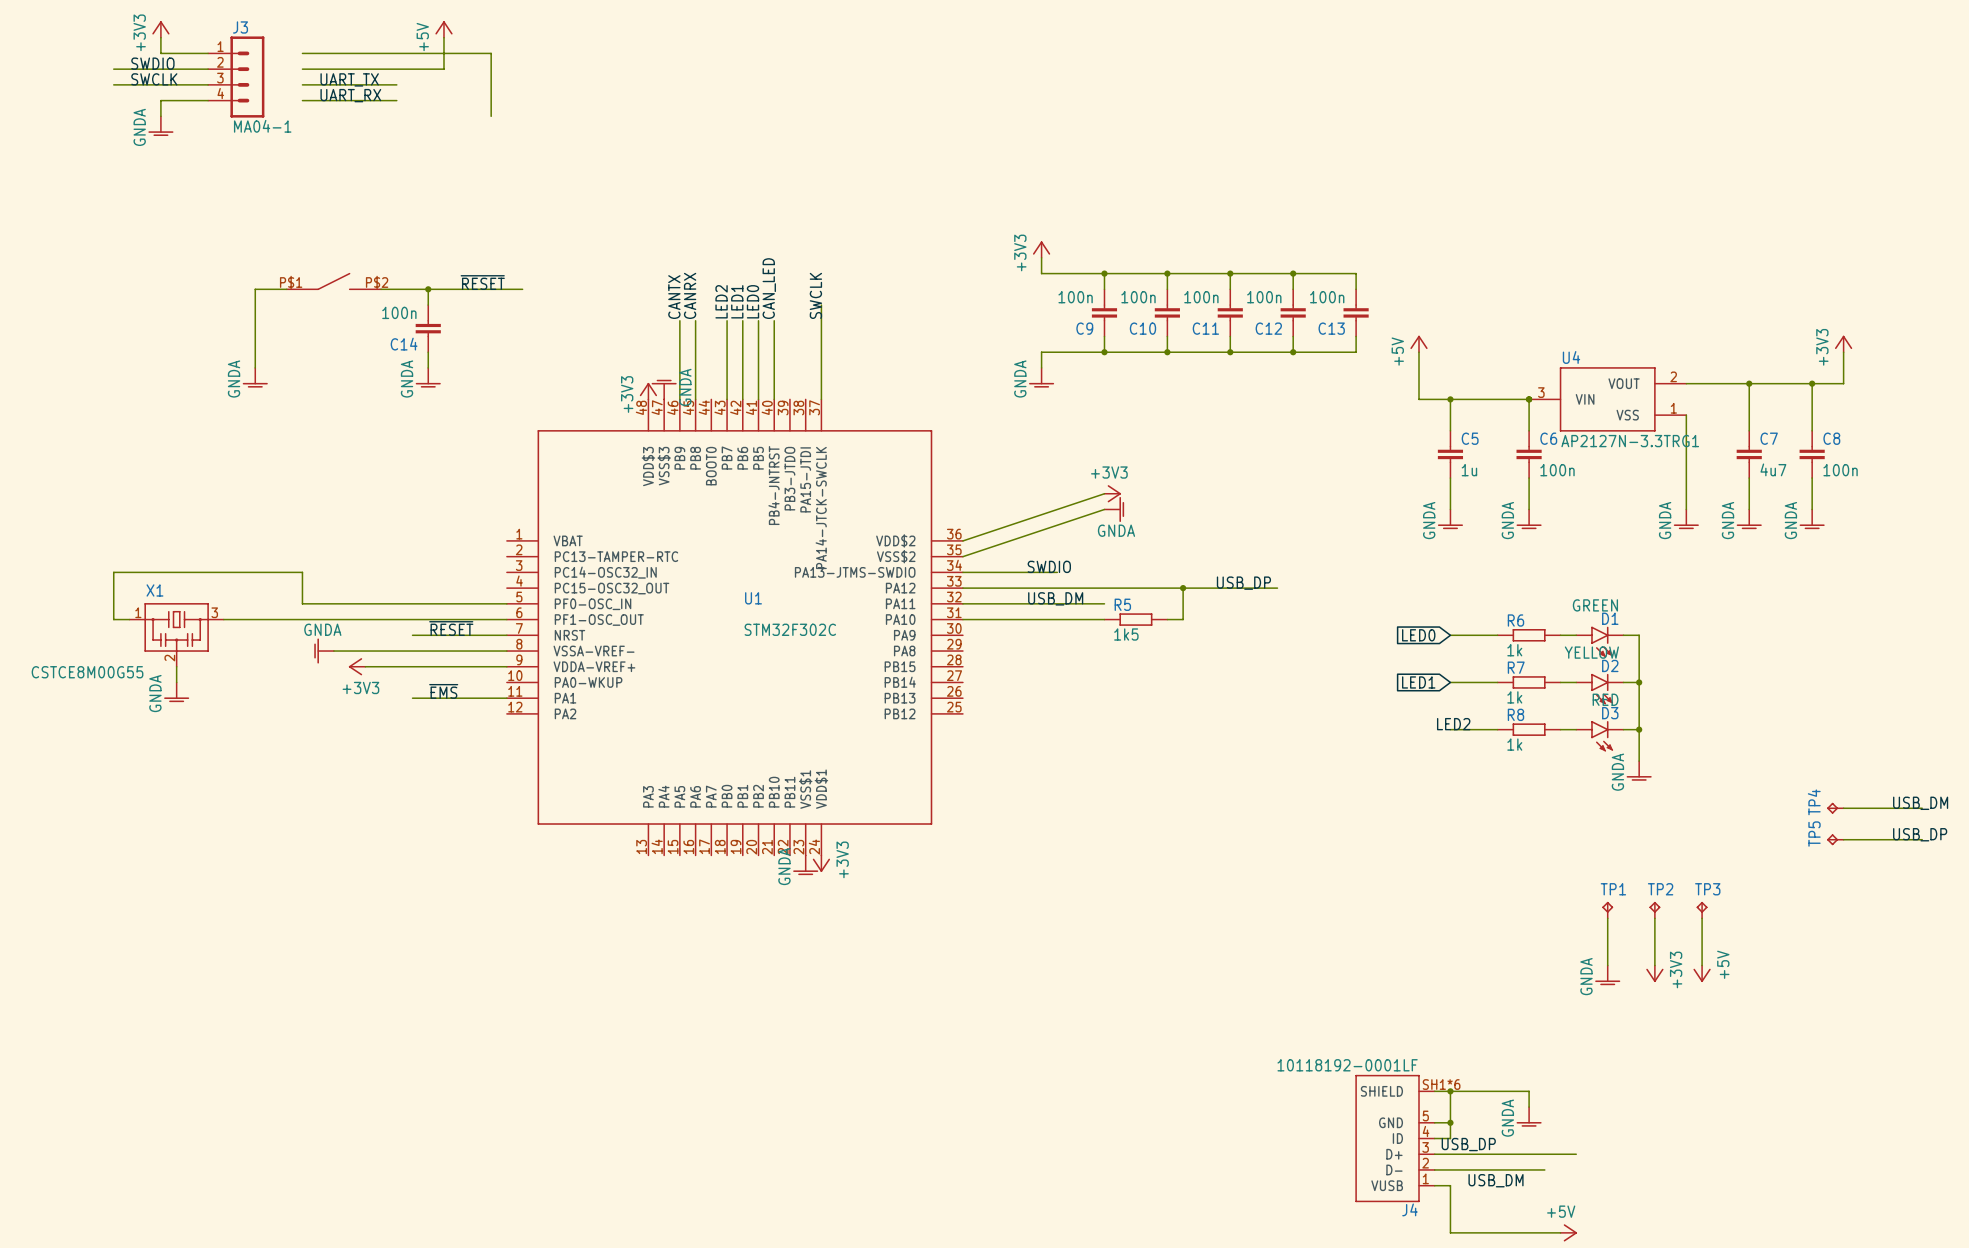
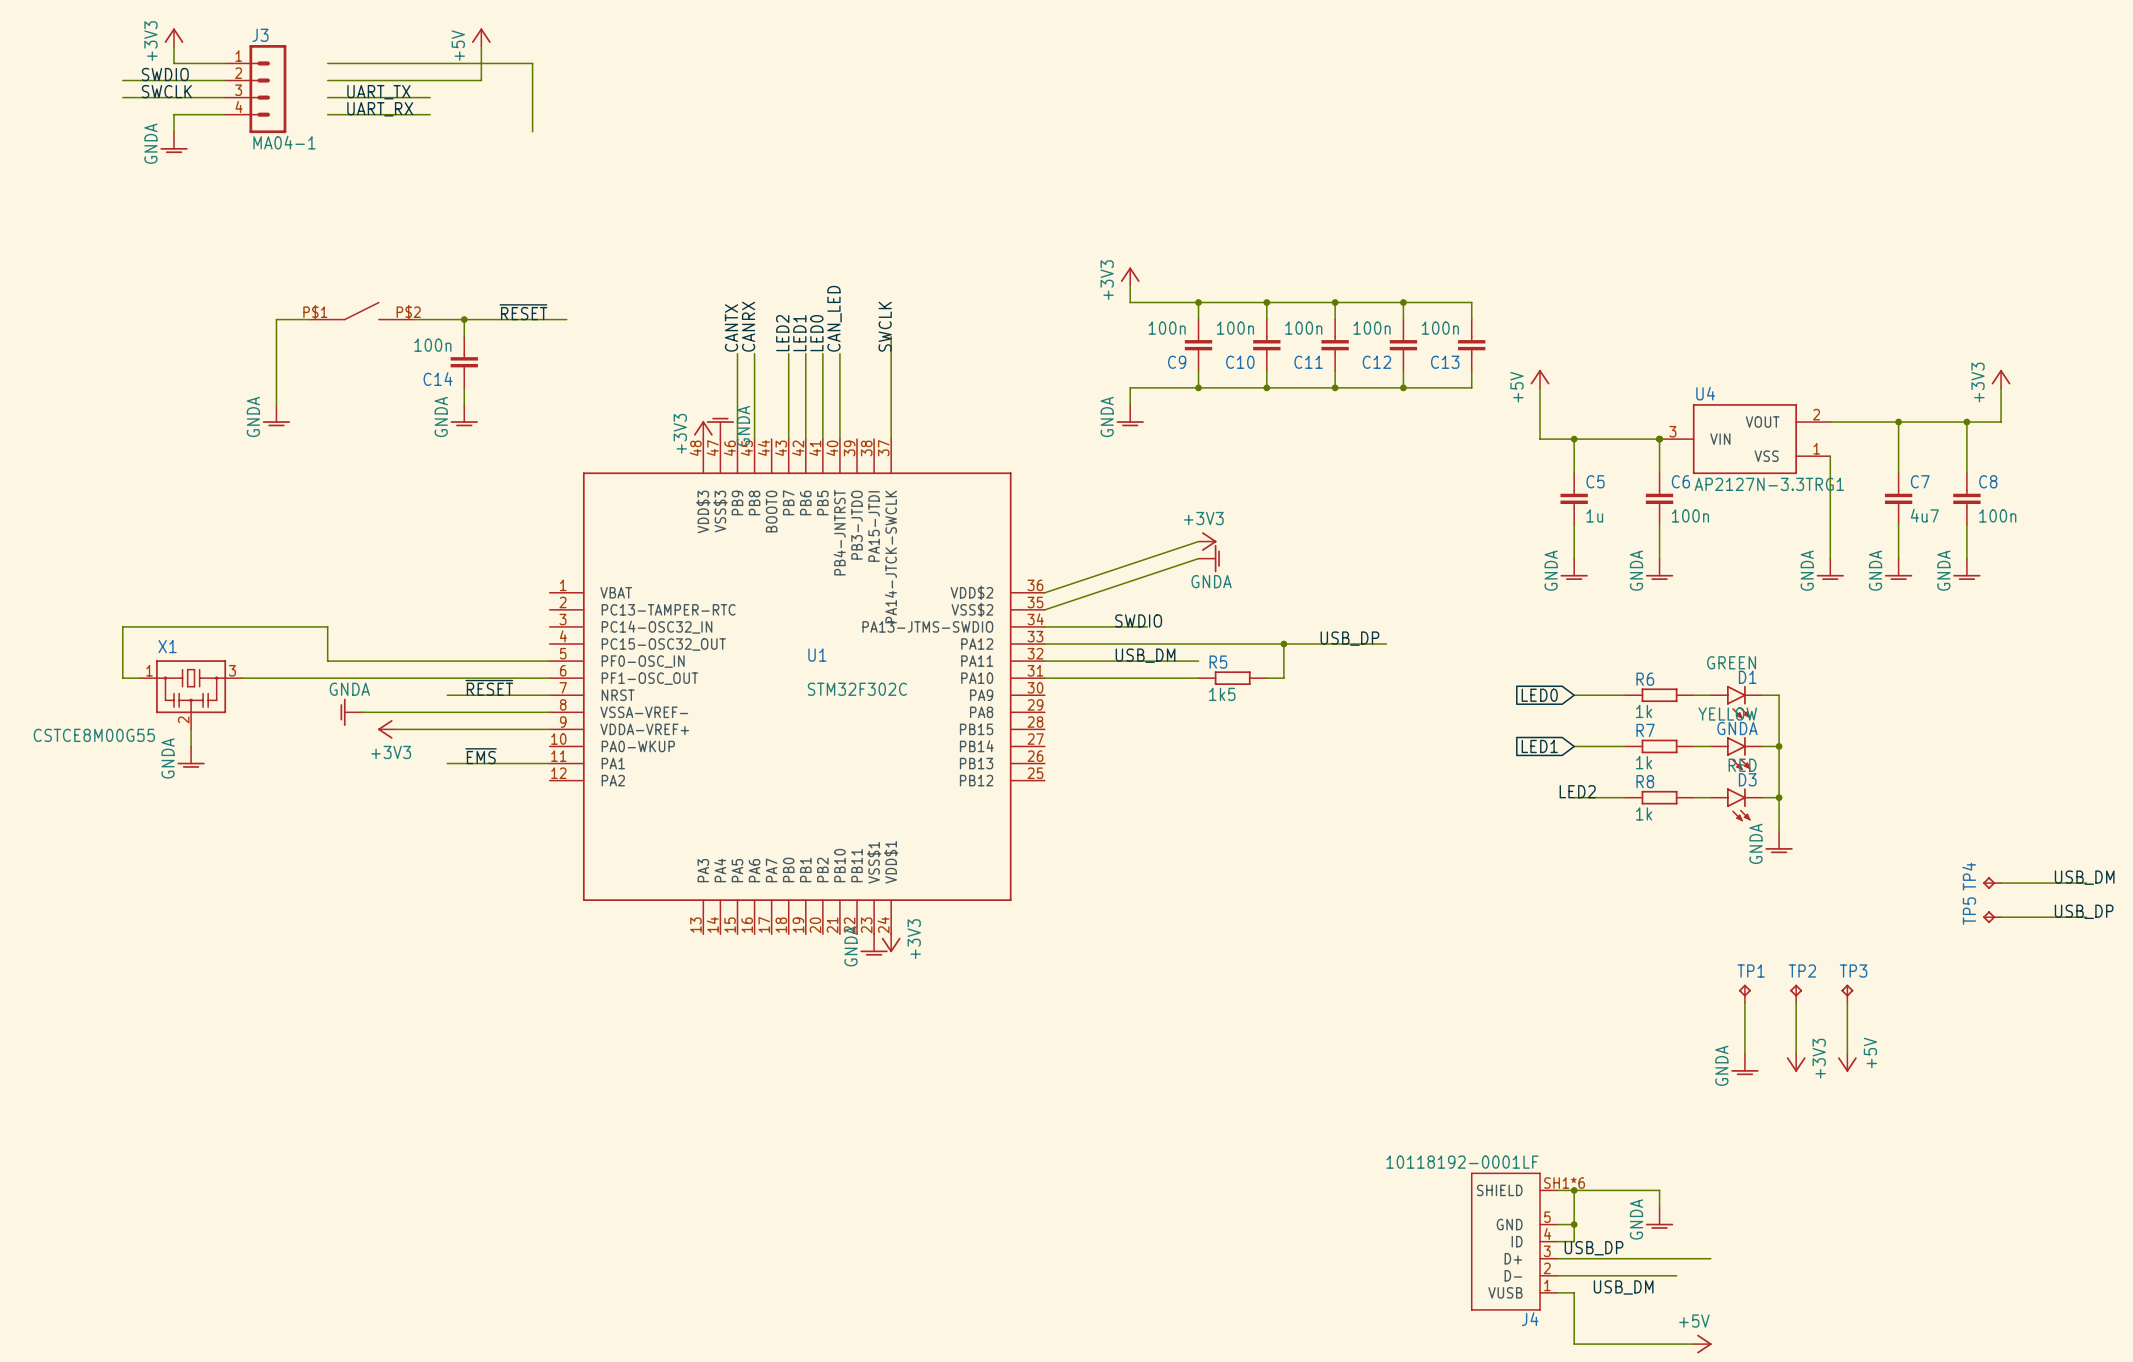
D2 name: D2 (1610, 665) -> GNDA (1737, 728)

